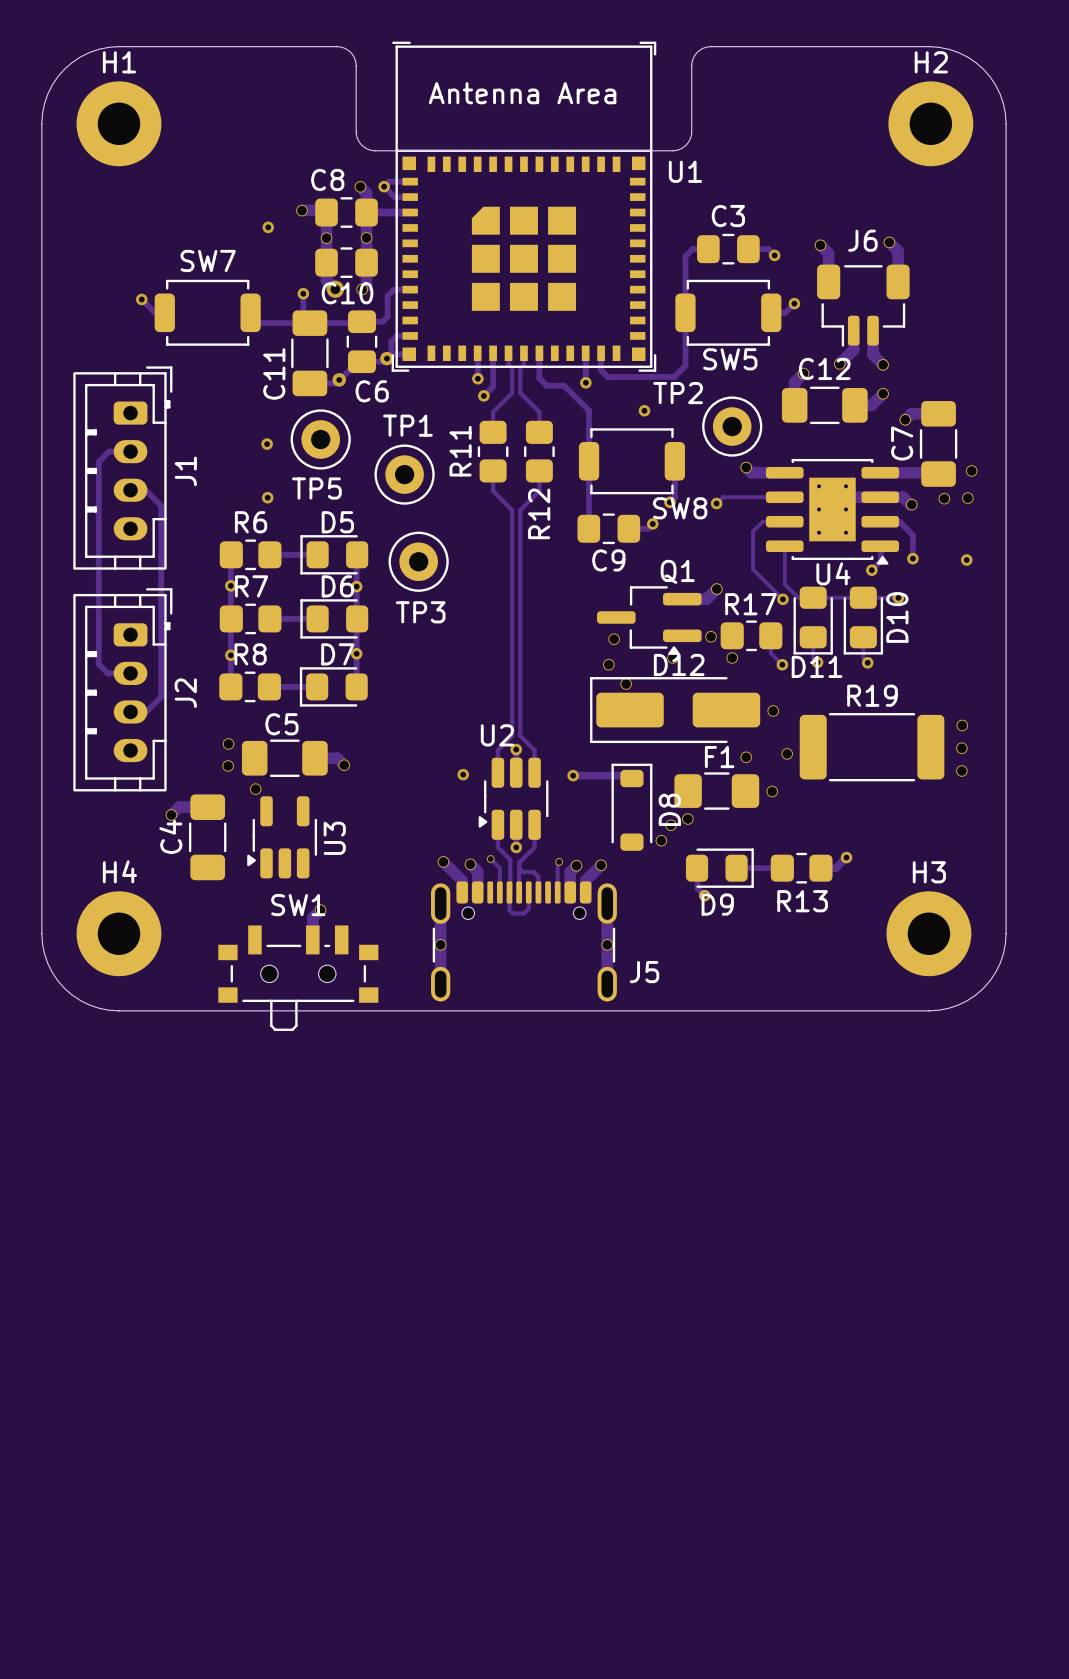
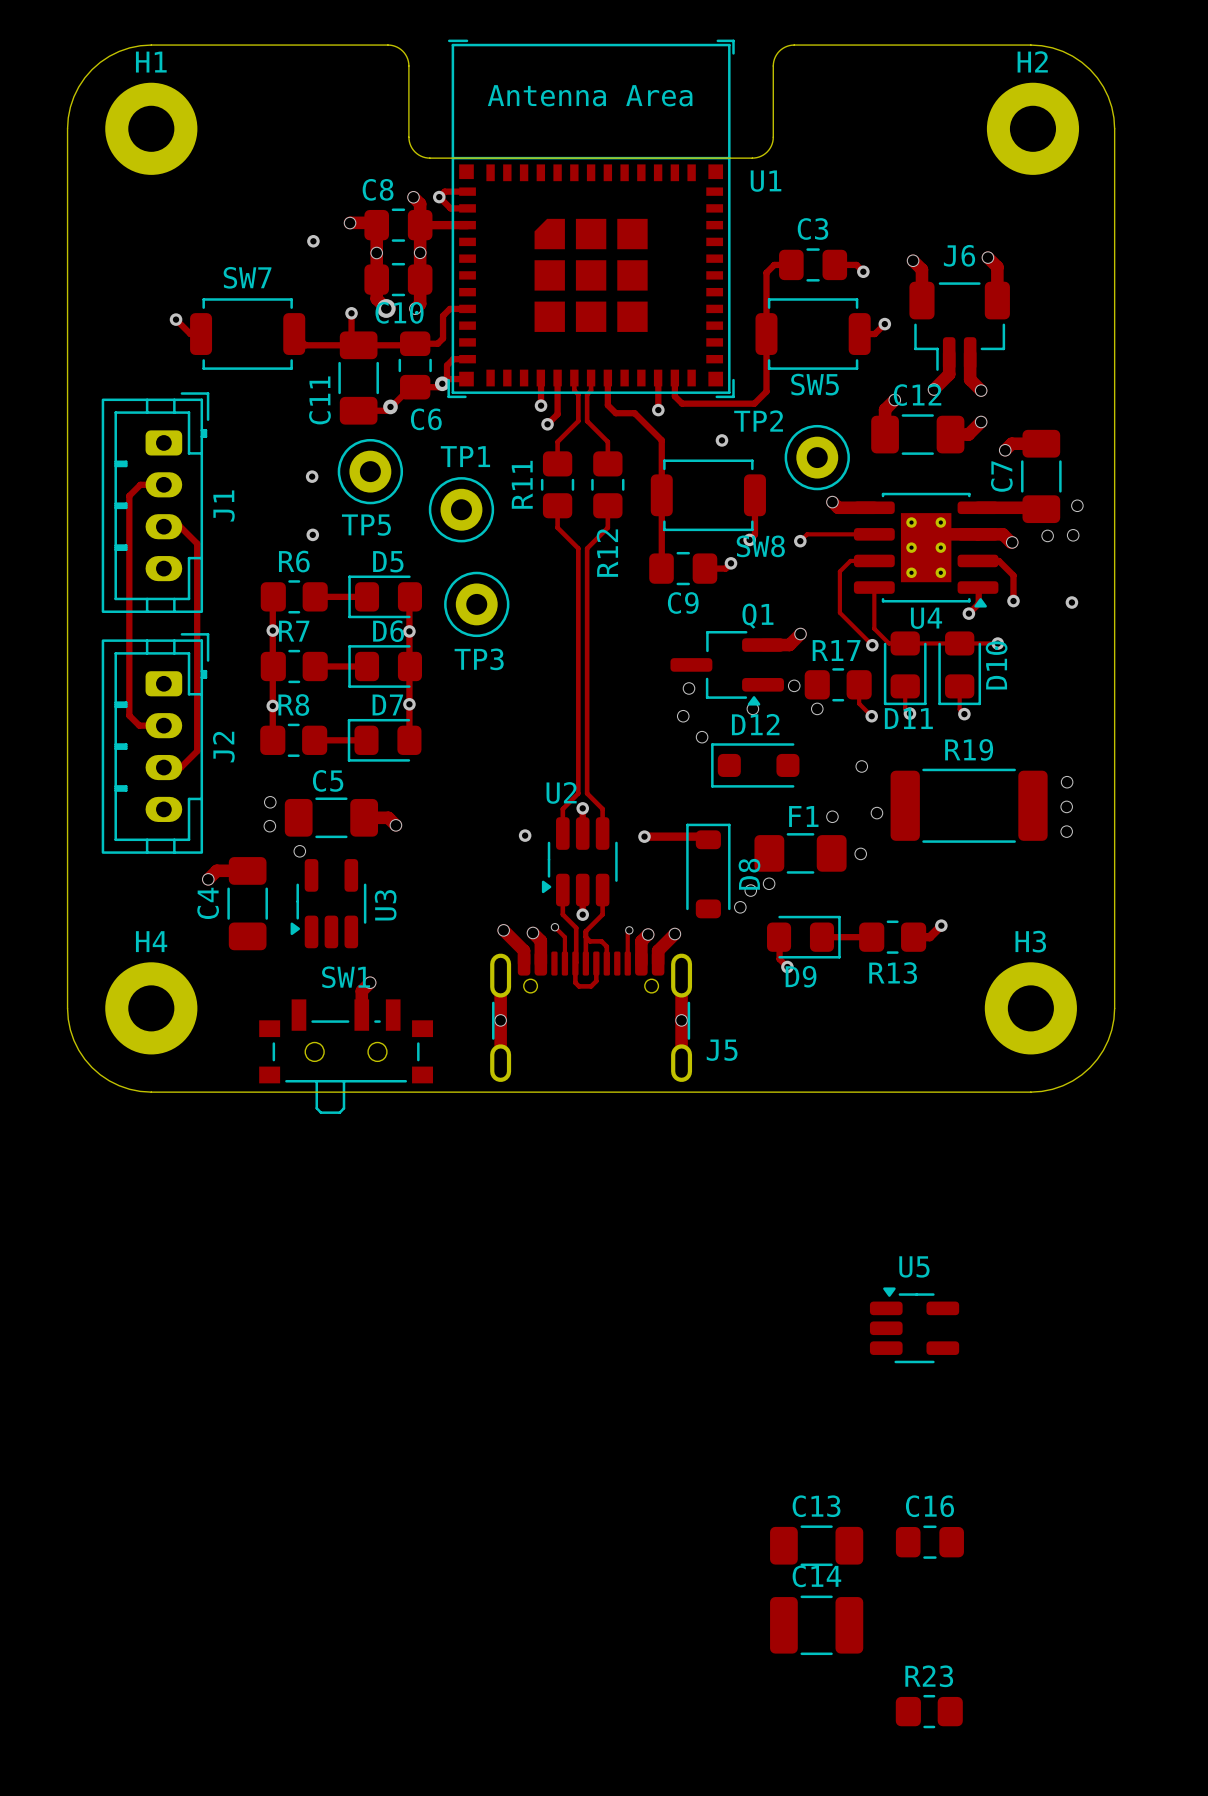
D12 footprint: [590, 677, 761, 744] -> [711, 743, 800, 788]
U5: none -> (914, 1325)
C16: none -> (929, 1542)
C13: none -> (816, 1545)
C14: none -> (816, 1625)
R23: none -> (929, 1711)

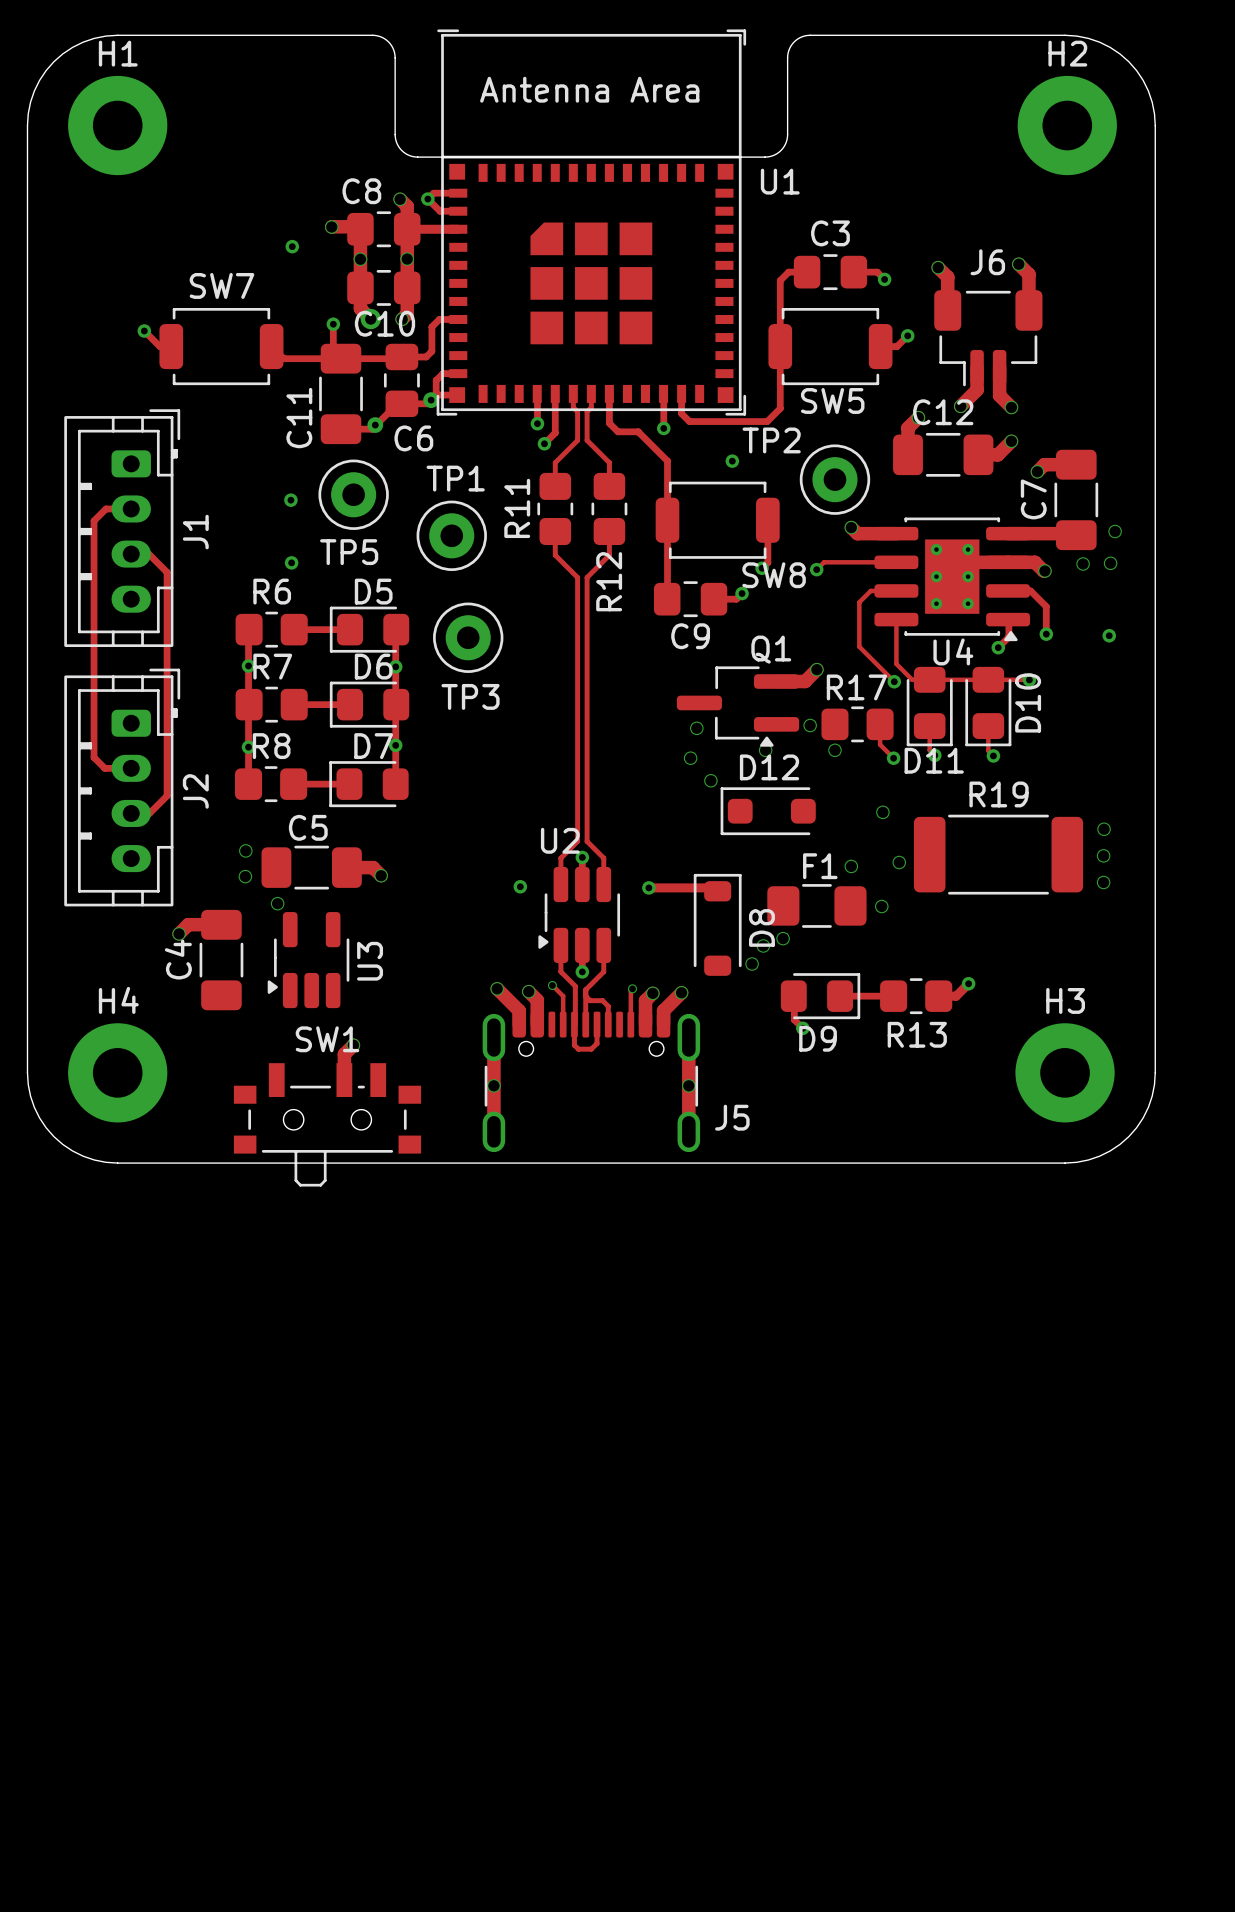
U5: (914, 1325) -> none
C16: (929, 1542) -> none
C13: (816, 1545) -> none
C14: (816, 1625) -> none
R23: (929, 1711) -> none

